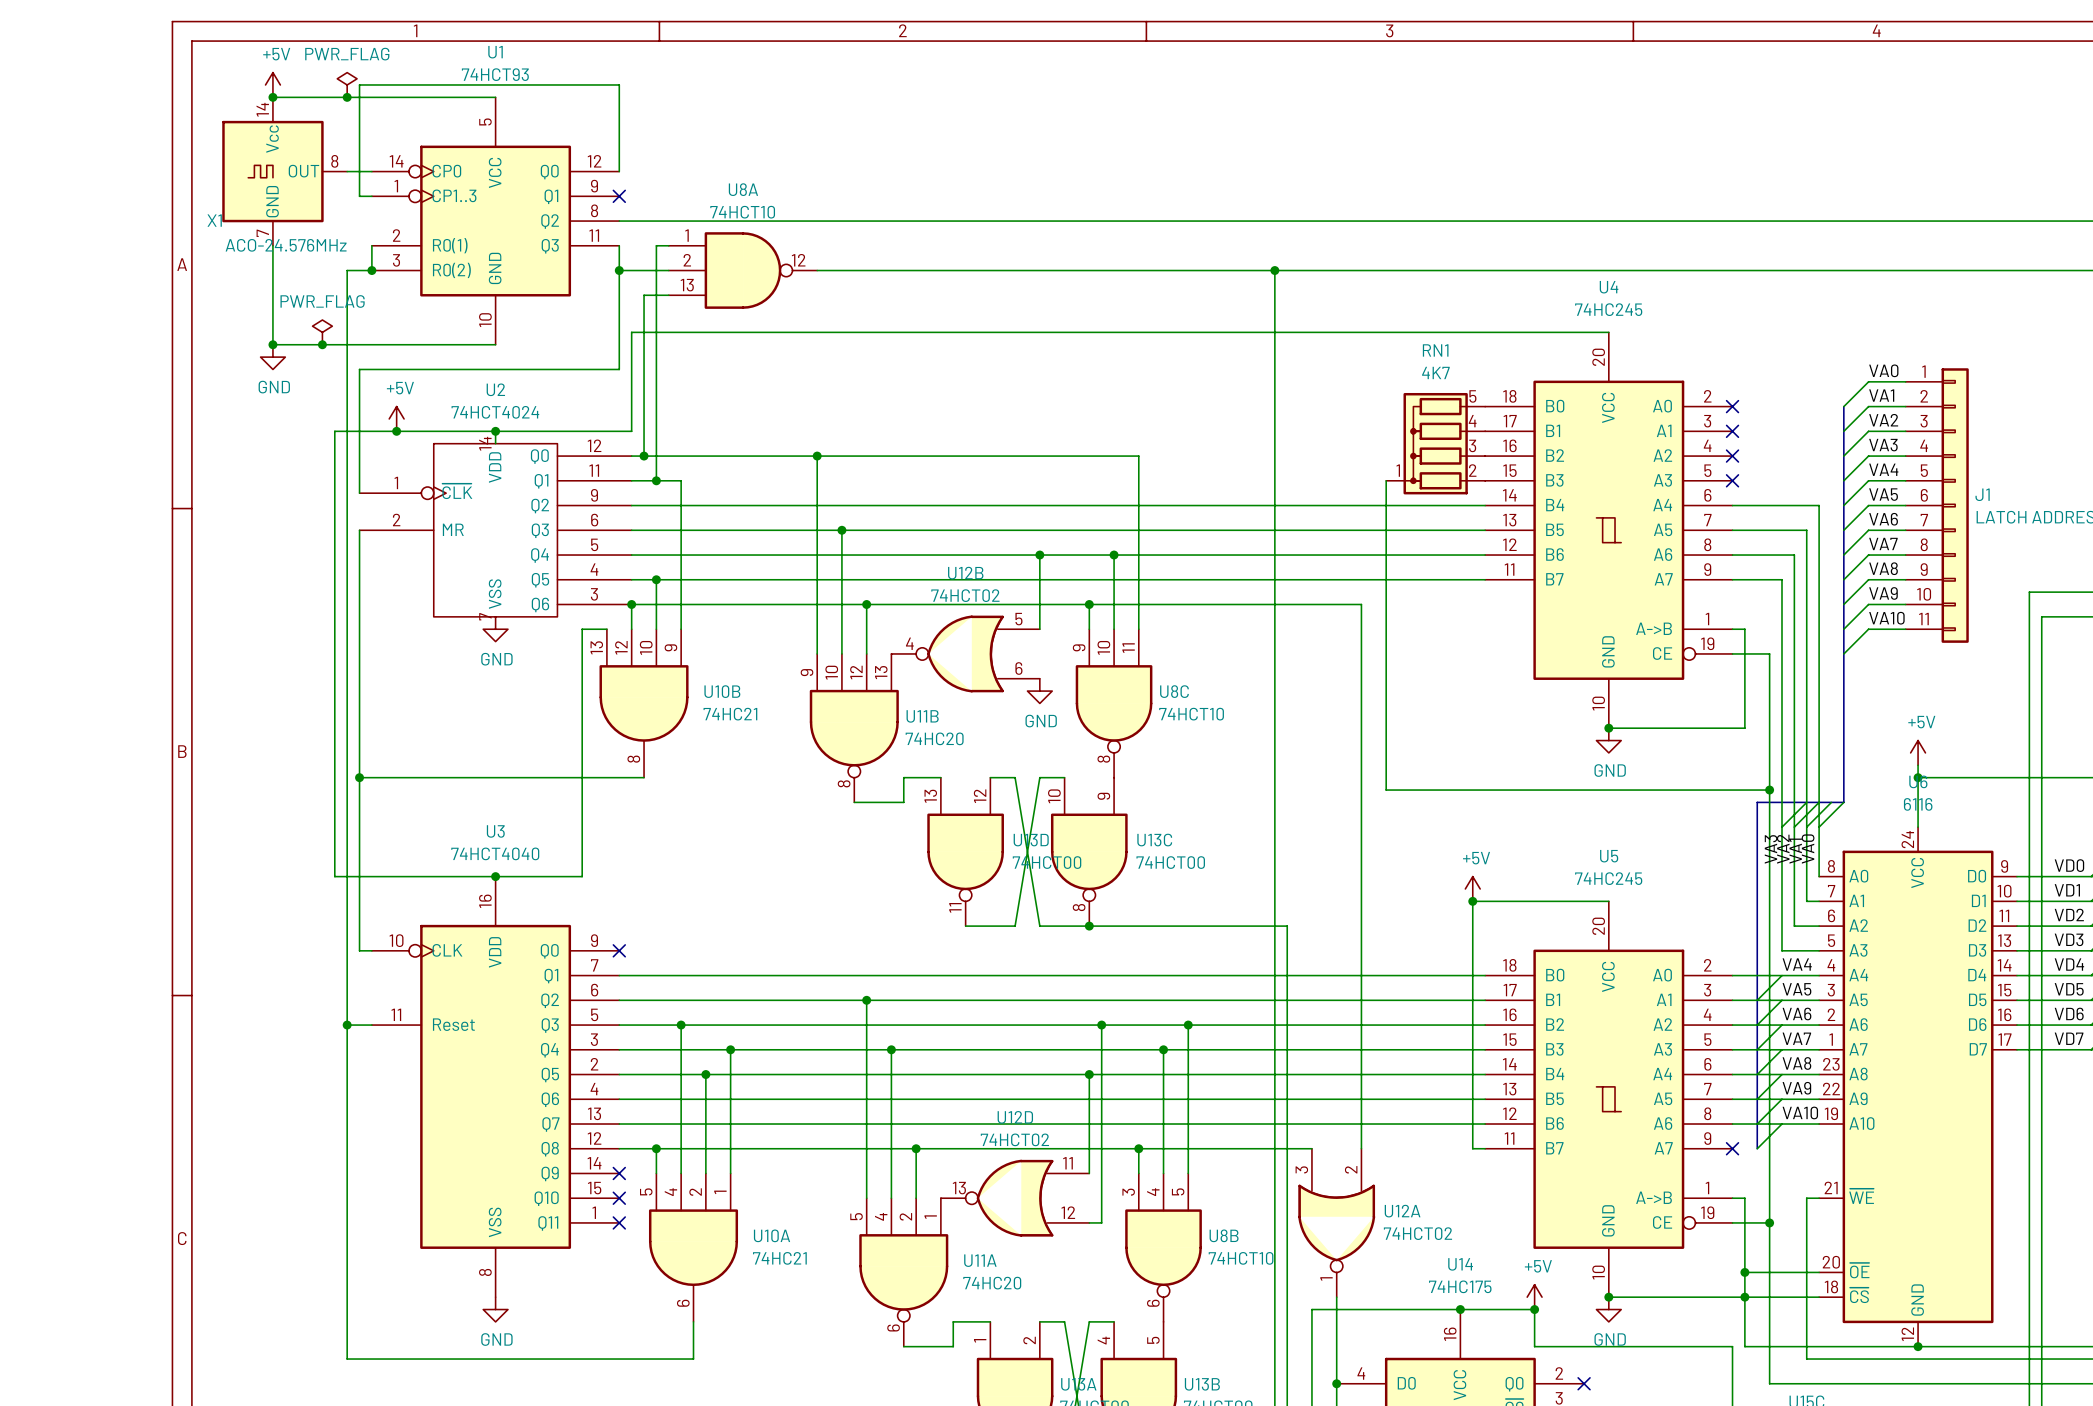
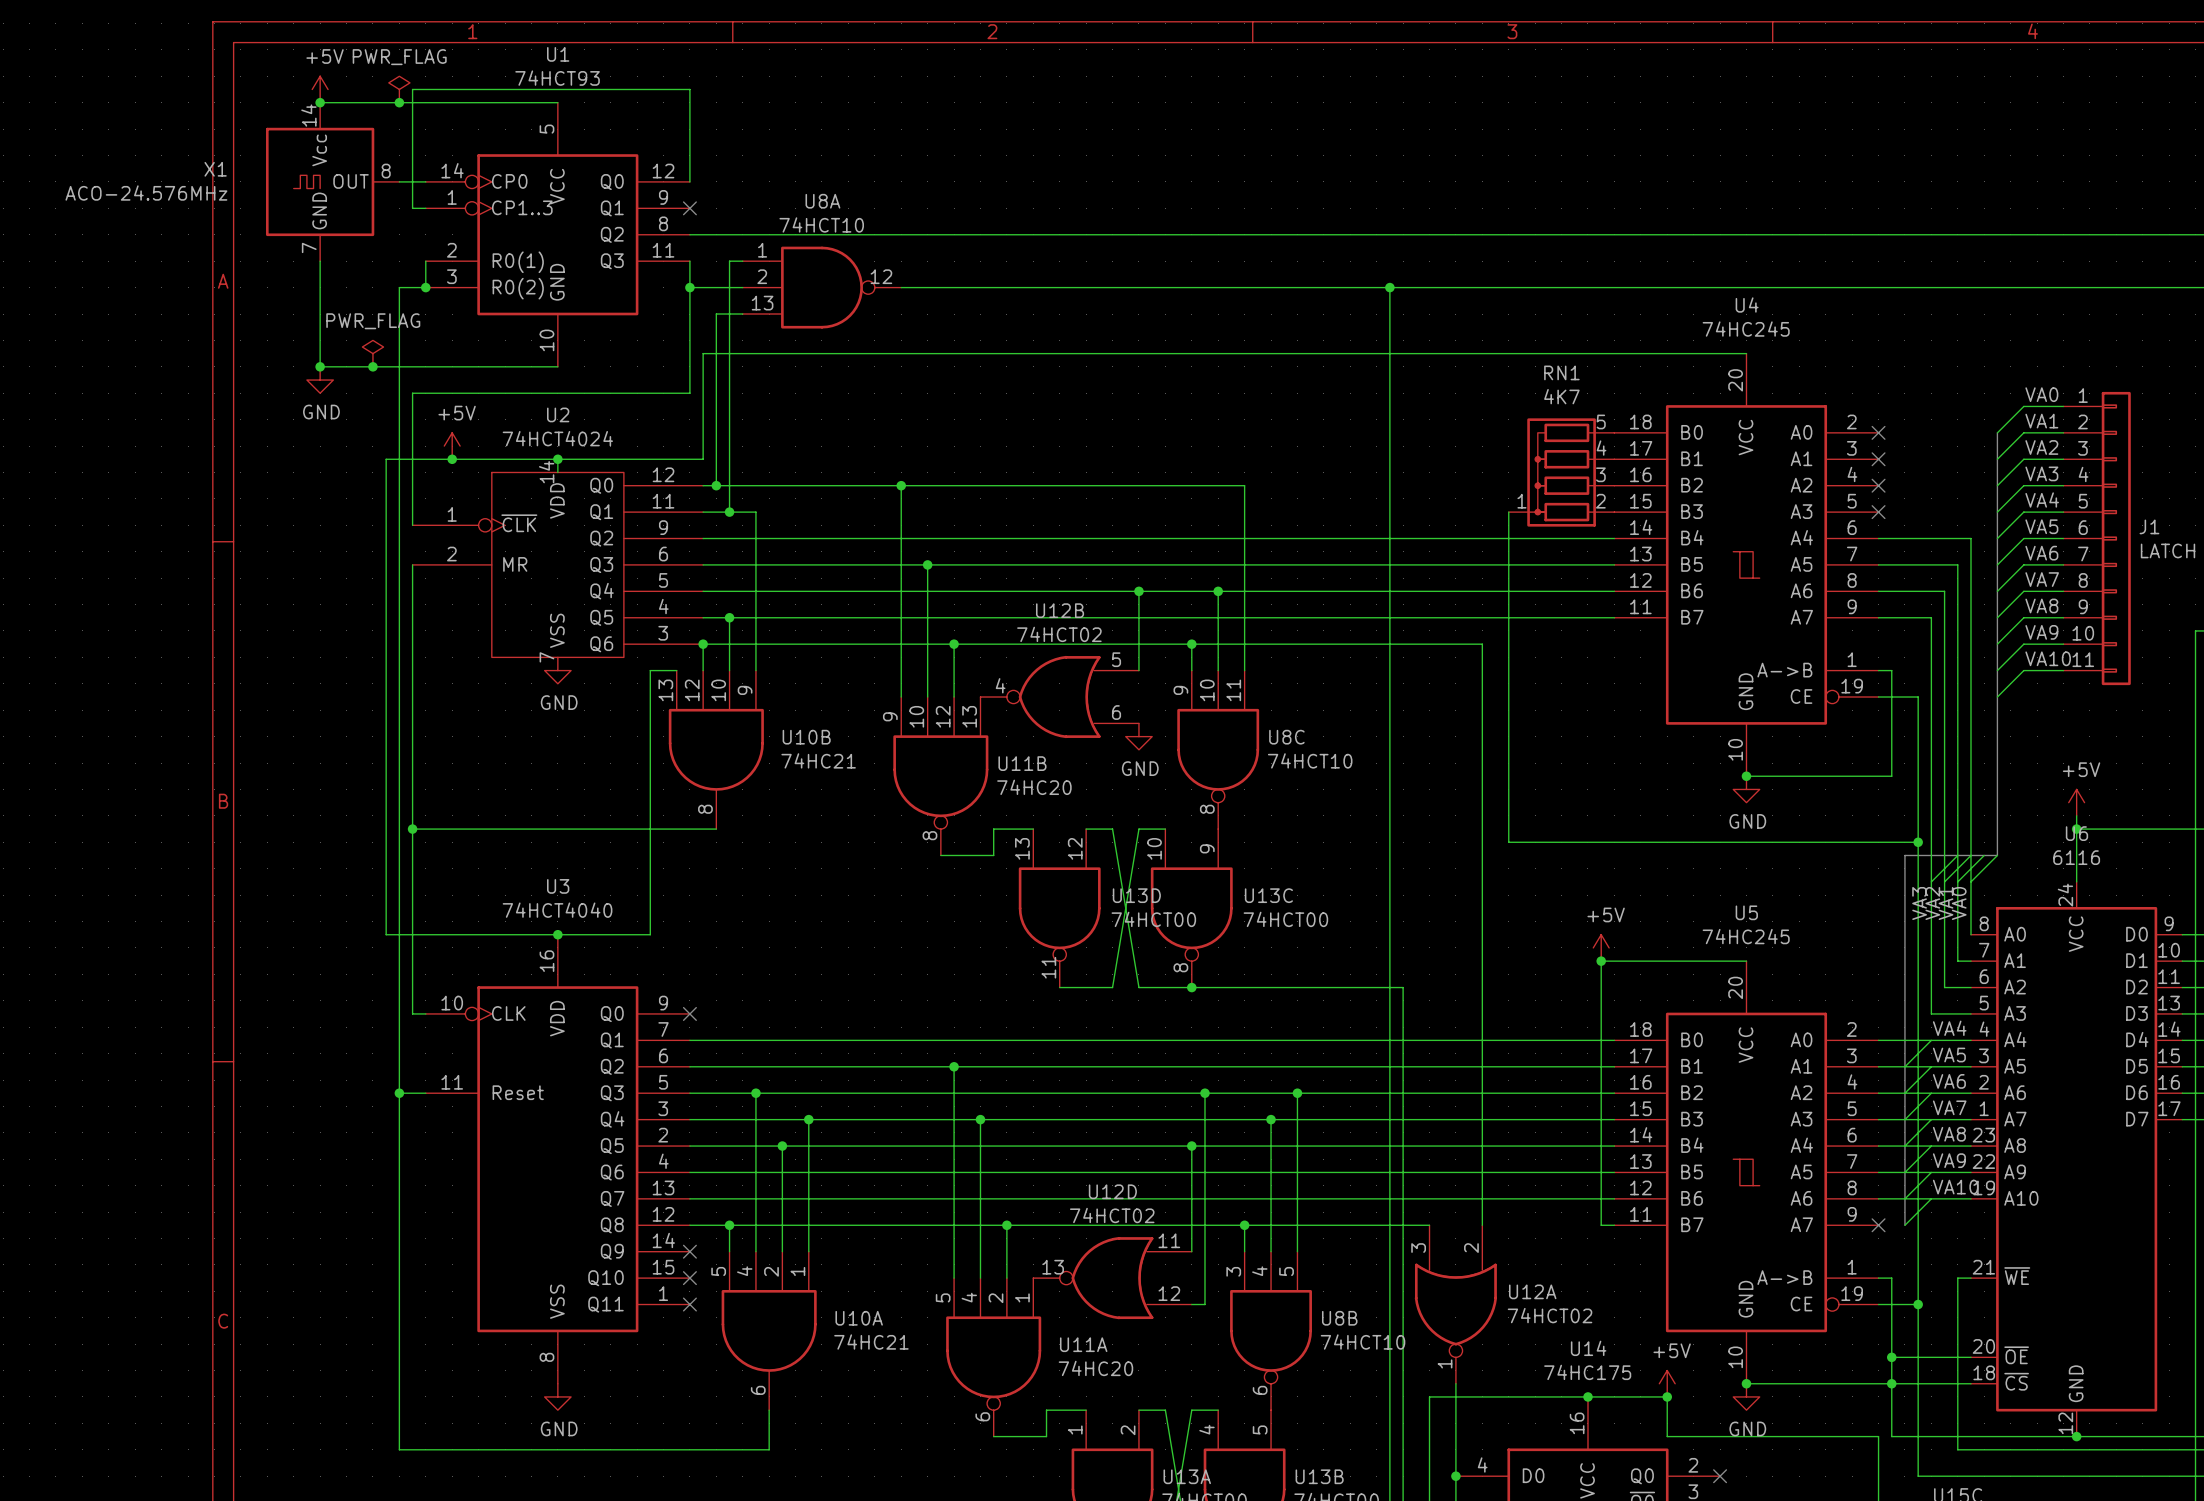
X1 name position: X1 (214, 220) -> X1 (215, 169)
X1 value position: ACO-24.576MHz (286, 245) -> ACO-24.576MHz (146, 193)

